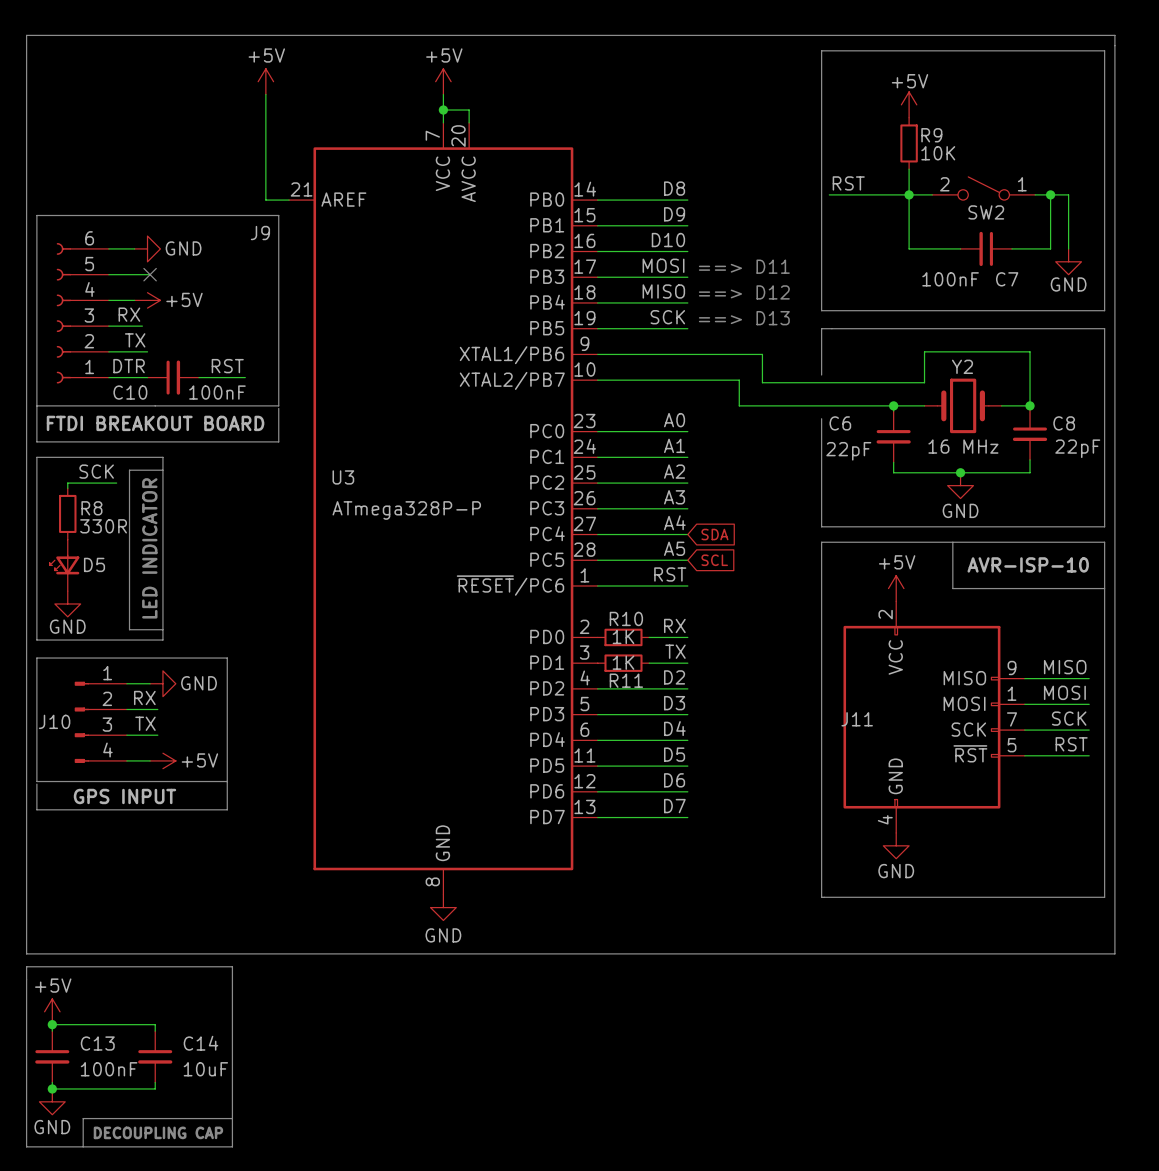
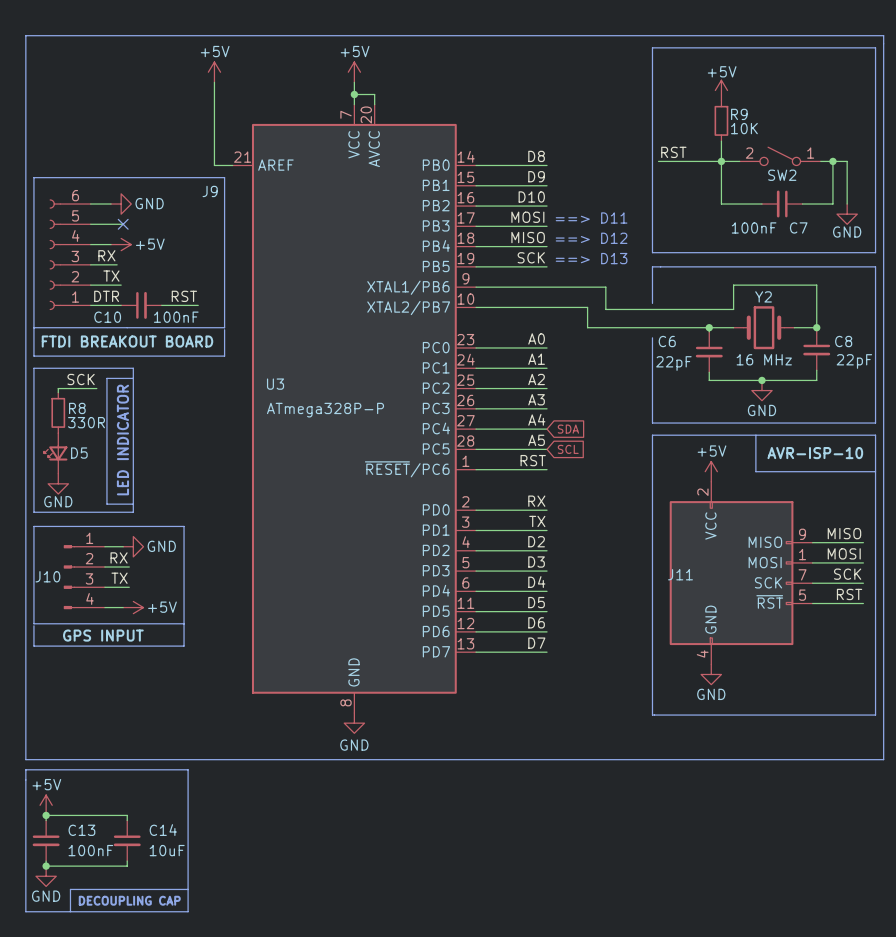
wire: none -> (476, 510) (516, 510)
R10: 1K (623, 637) -> none
wire: none -> (476, 530) (516, 530)
R11: 1K (623, 663) -> none

